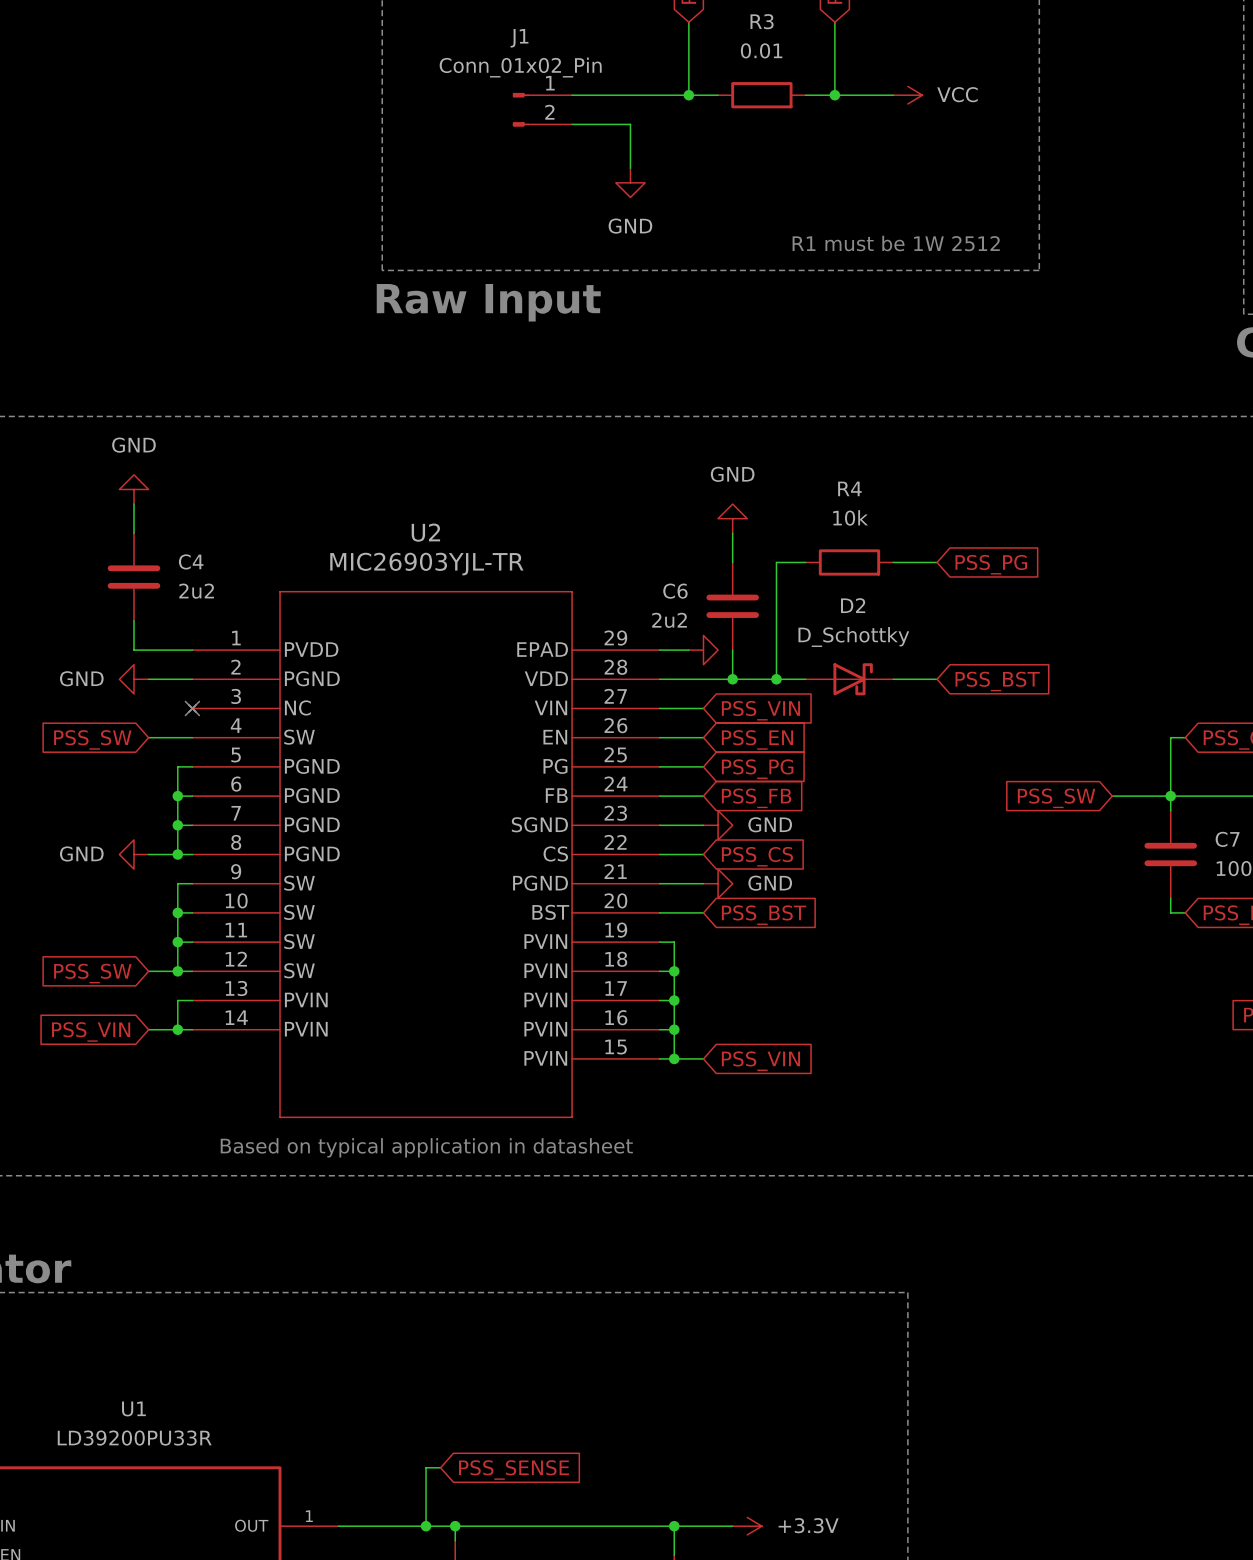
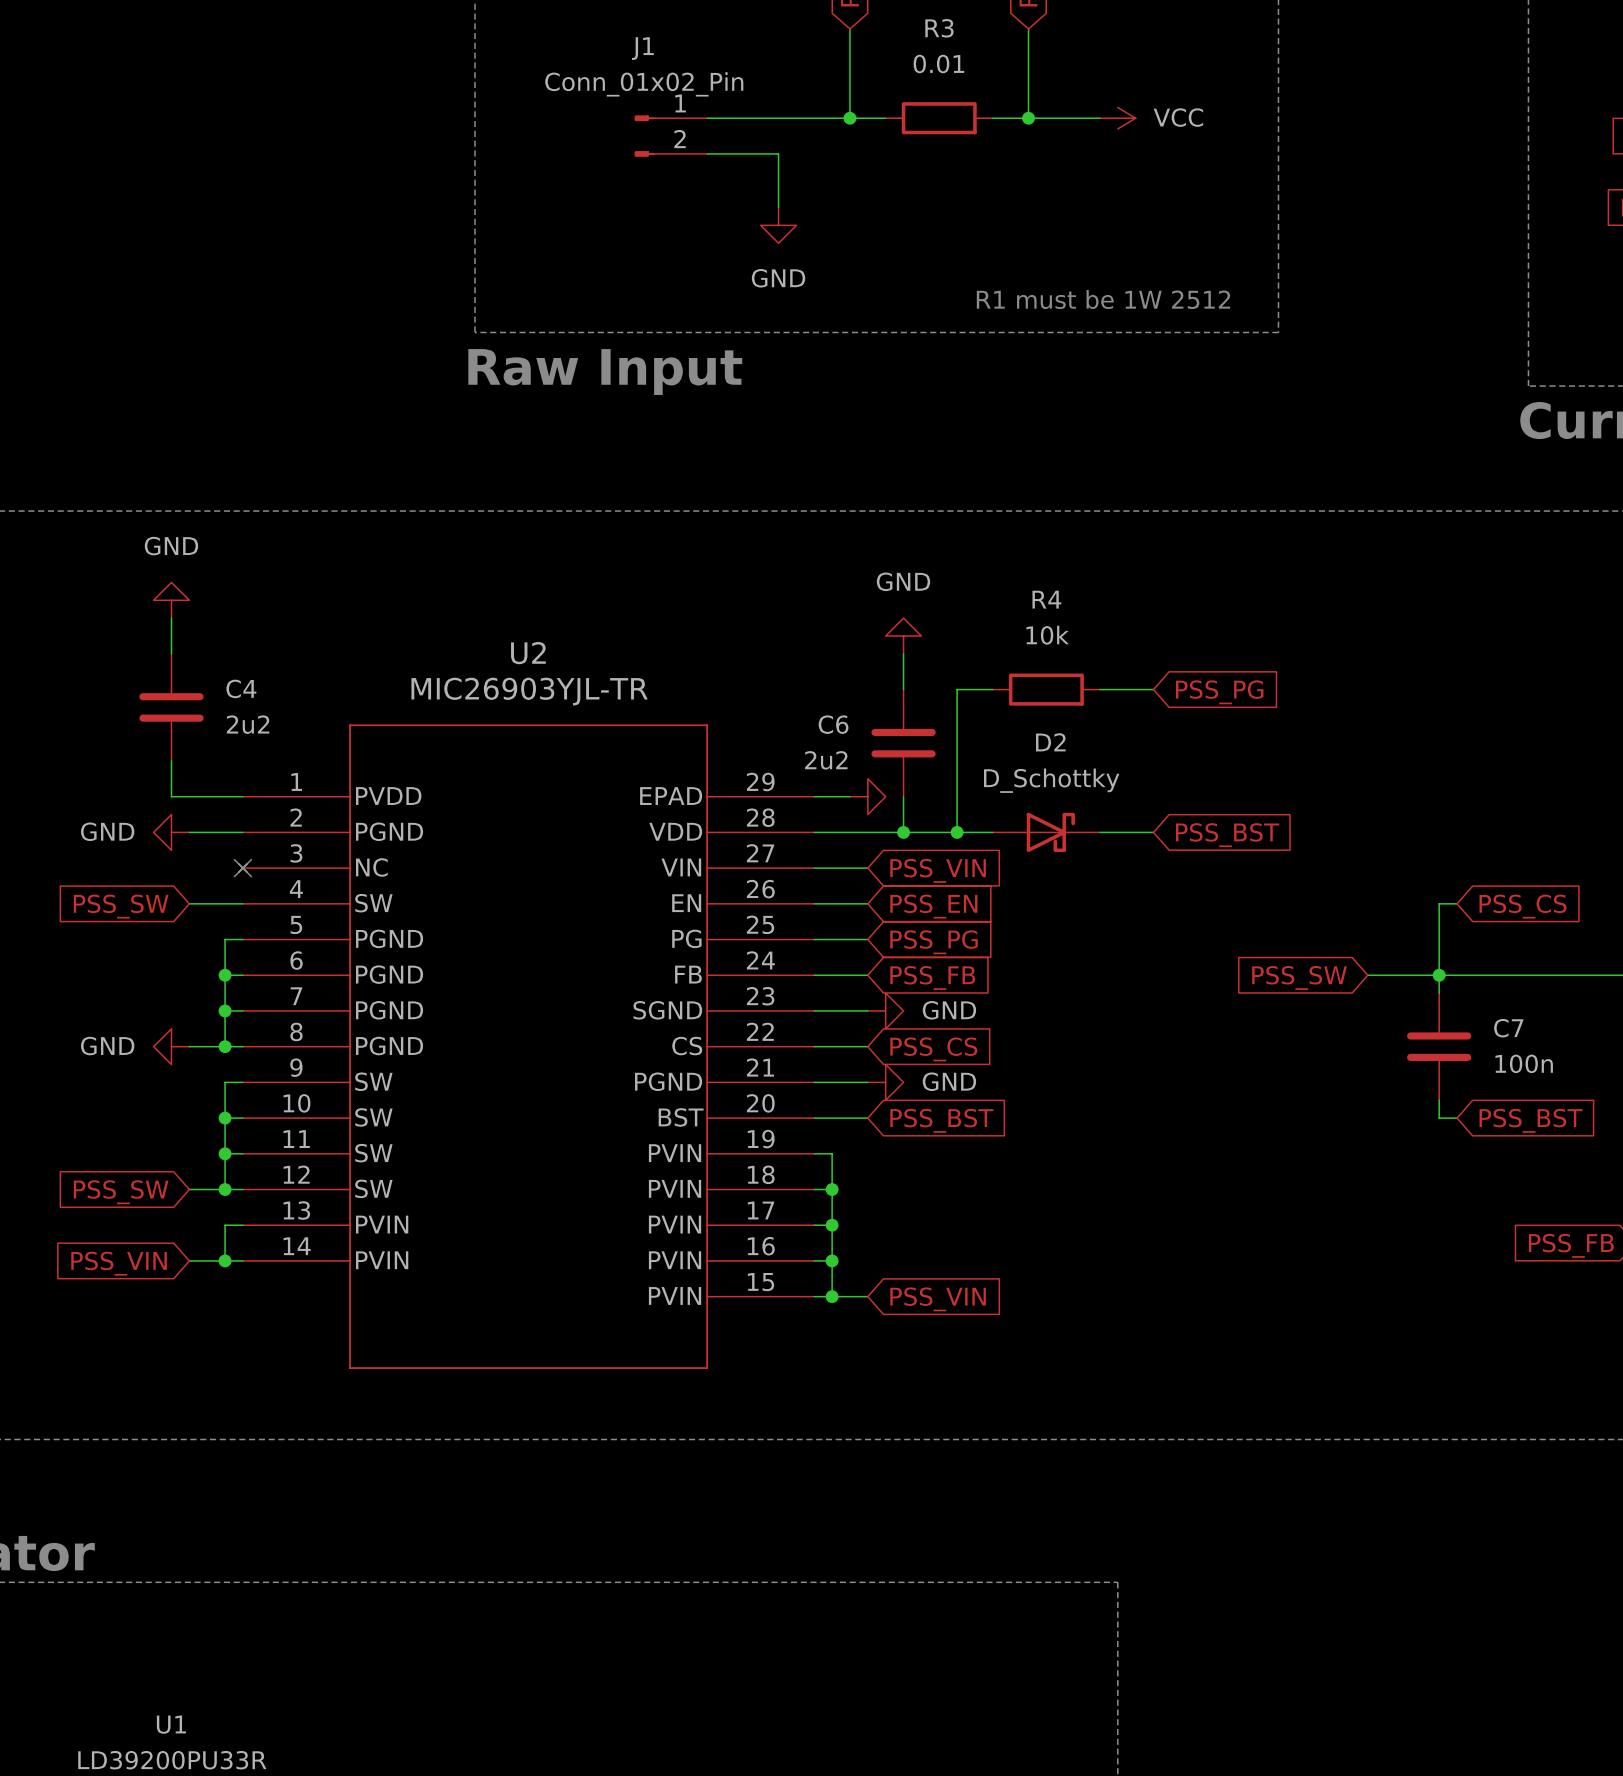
text: Based on typical application in datasheet (426, 1147) -> none

